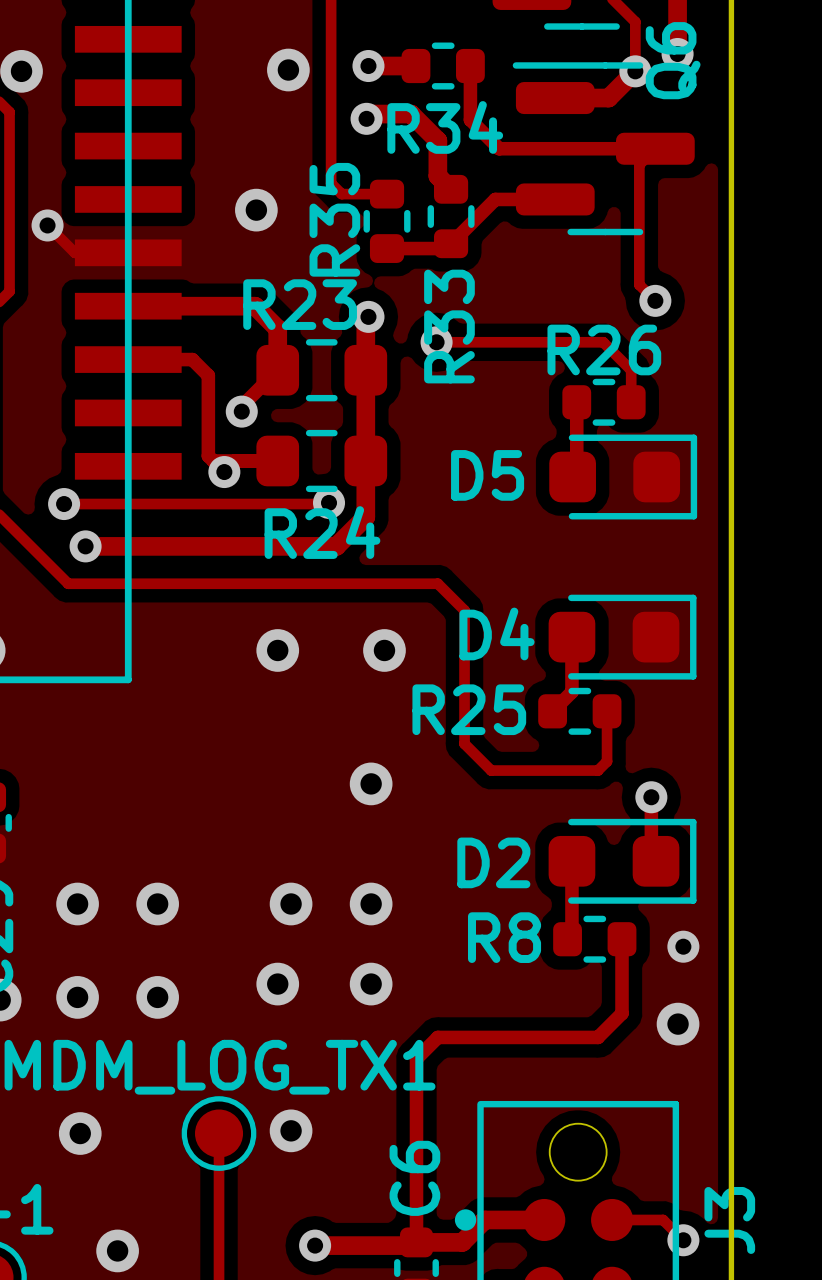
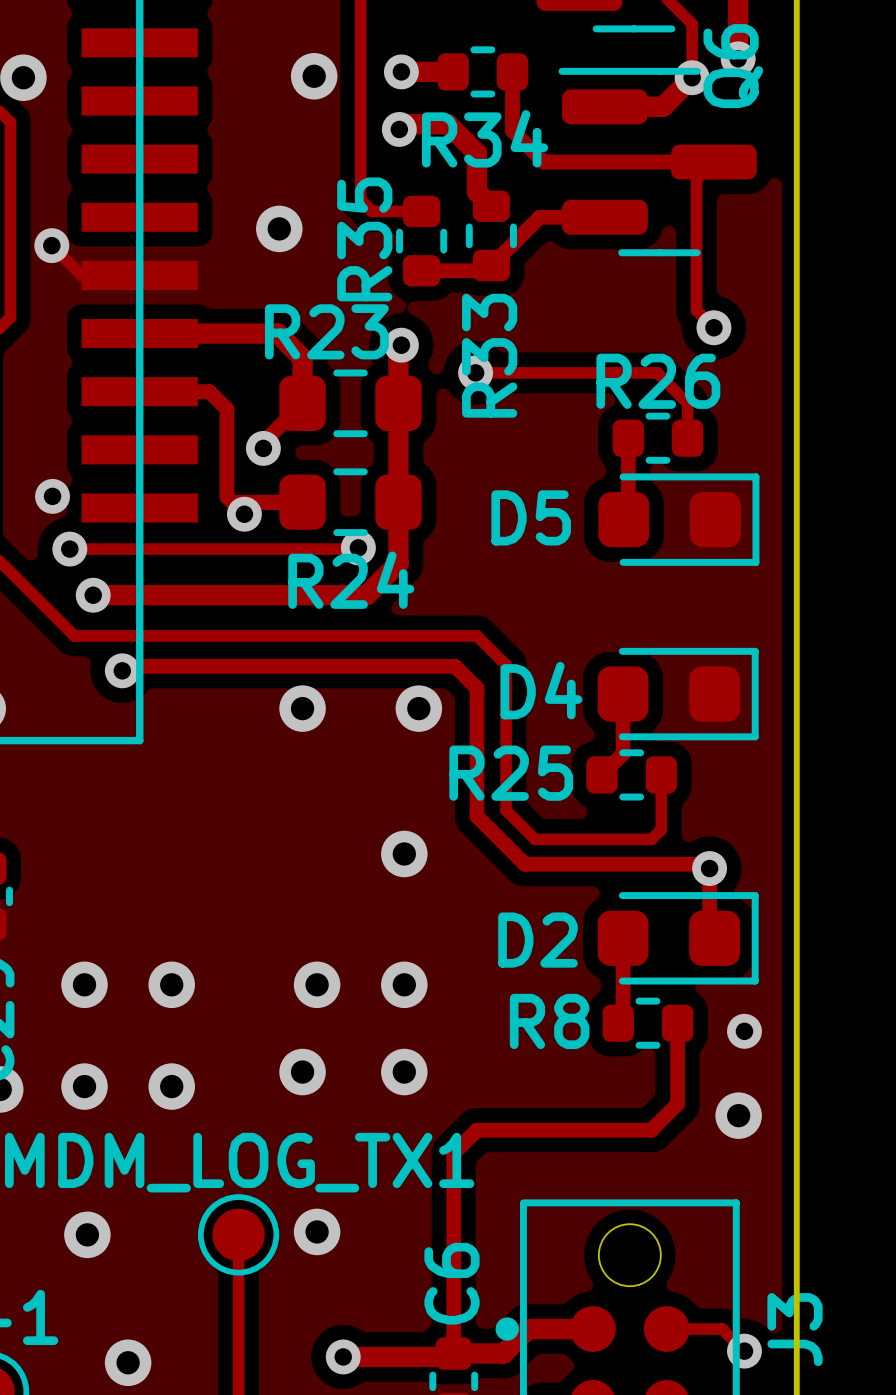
via: none -> (52, 496)
track: none -> (122, 670) (126, 666) (455, 666) (477, 688) (477, 816) (524, 864) (705, 864) (709, 868)
via: none -> (122, 670)

